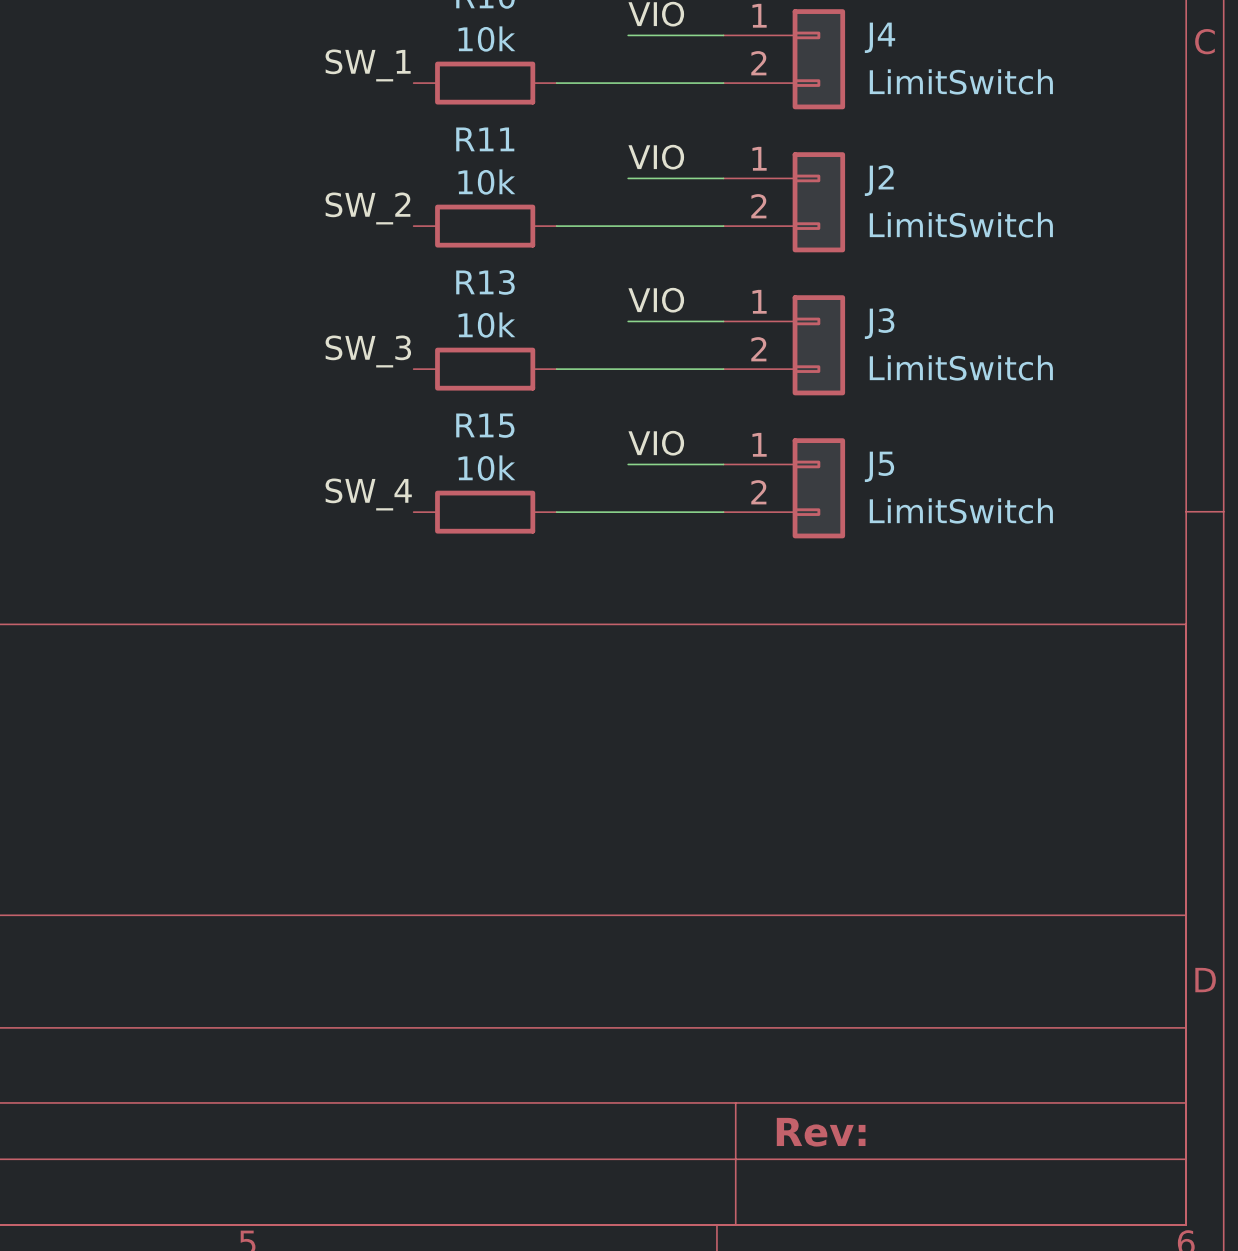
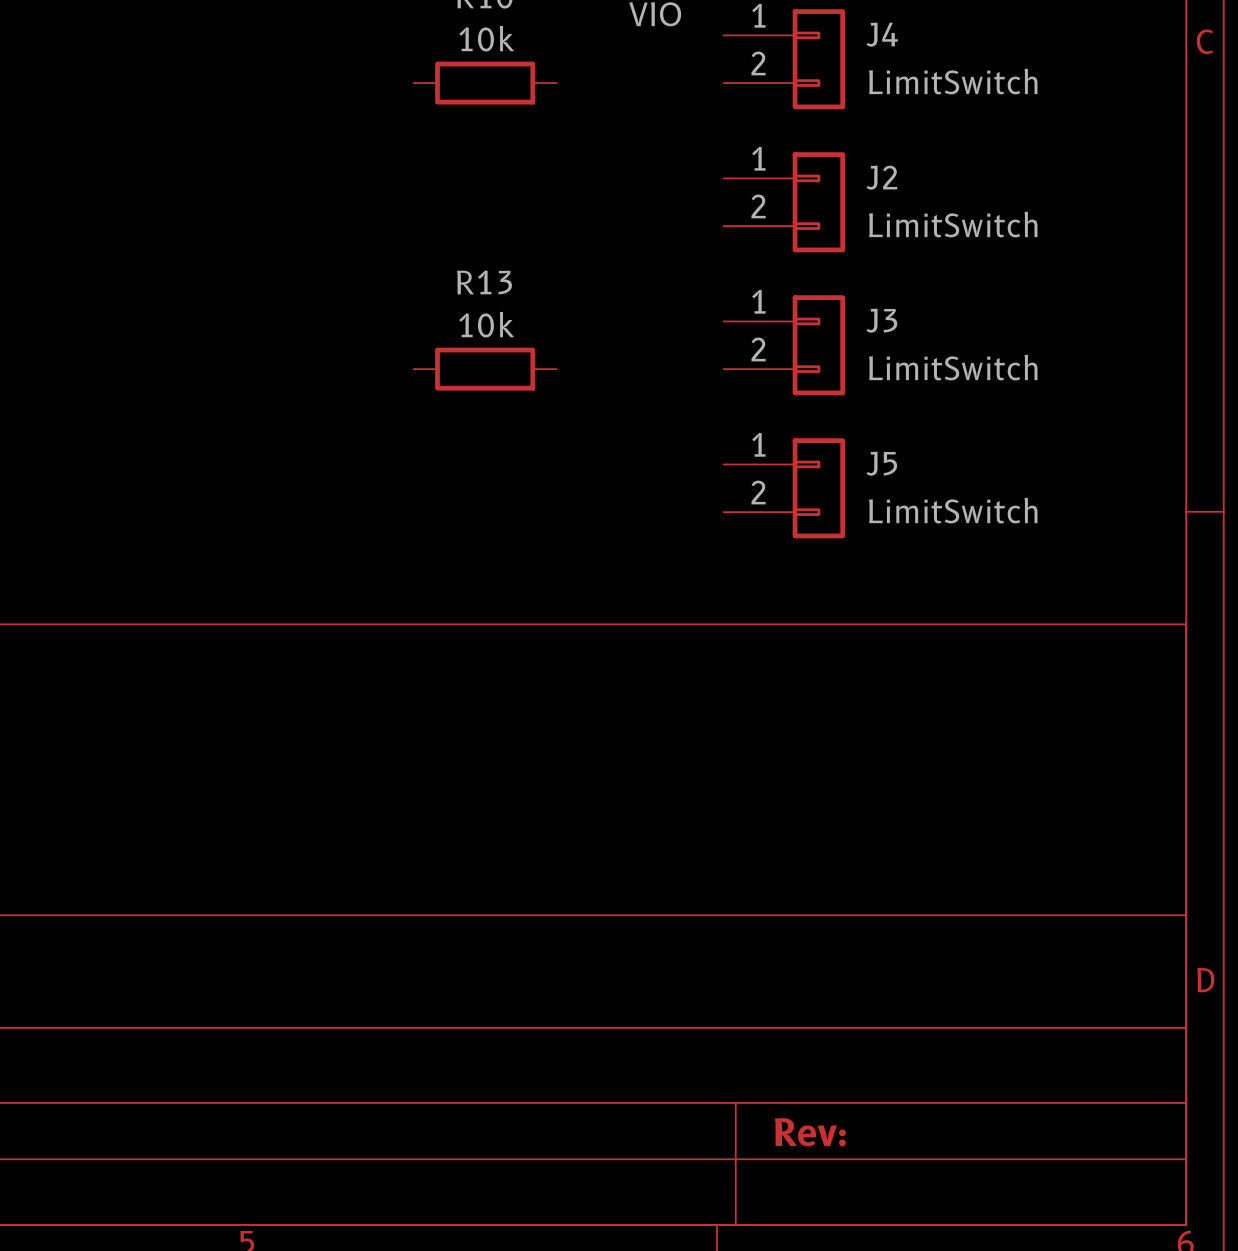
wire: (628, 35) (723, 35) -> none
label: SW_1 (368, 65) -> none
wire: (556, 83) (723, 83) -> none
label: VIO (656, 157) -> none
wire: (628, 178) (723, 178) -> none
label: SW_2 (367, 208) -> none
R11: 10k (485, 226) -> none
wire: (556, 226) (723, 226) -> none
label: VIO (656, 300) -> none
wire: (628, 321) (723, 321) -> none
label: SW_3 (368, 351) -> none
wire: (556, 369) (723, 369) -> none
label: VIO (656, 443) -> none
wire: (628, 464) (723, 464) -> none
label: SW_4 (368, 494) -> none
R15: 10k (485, 512) -> none
wire: (556, 512) (723, 512) -> none

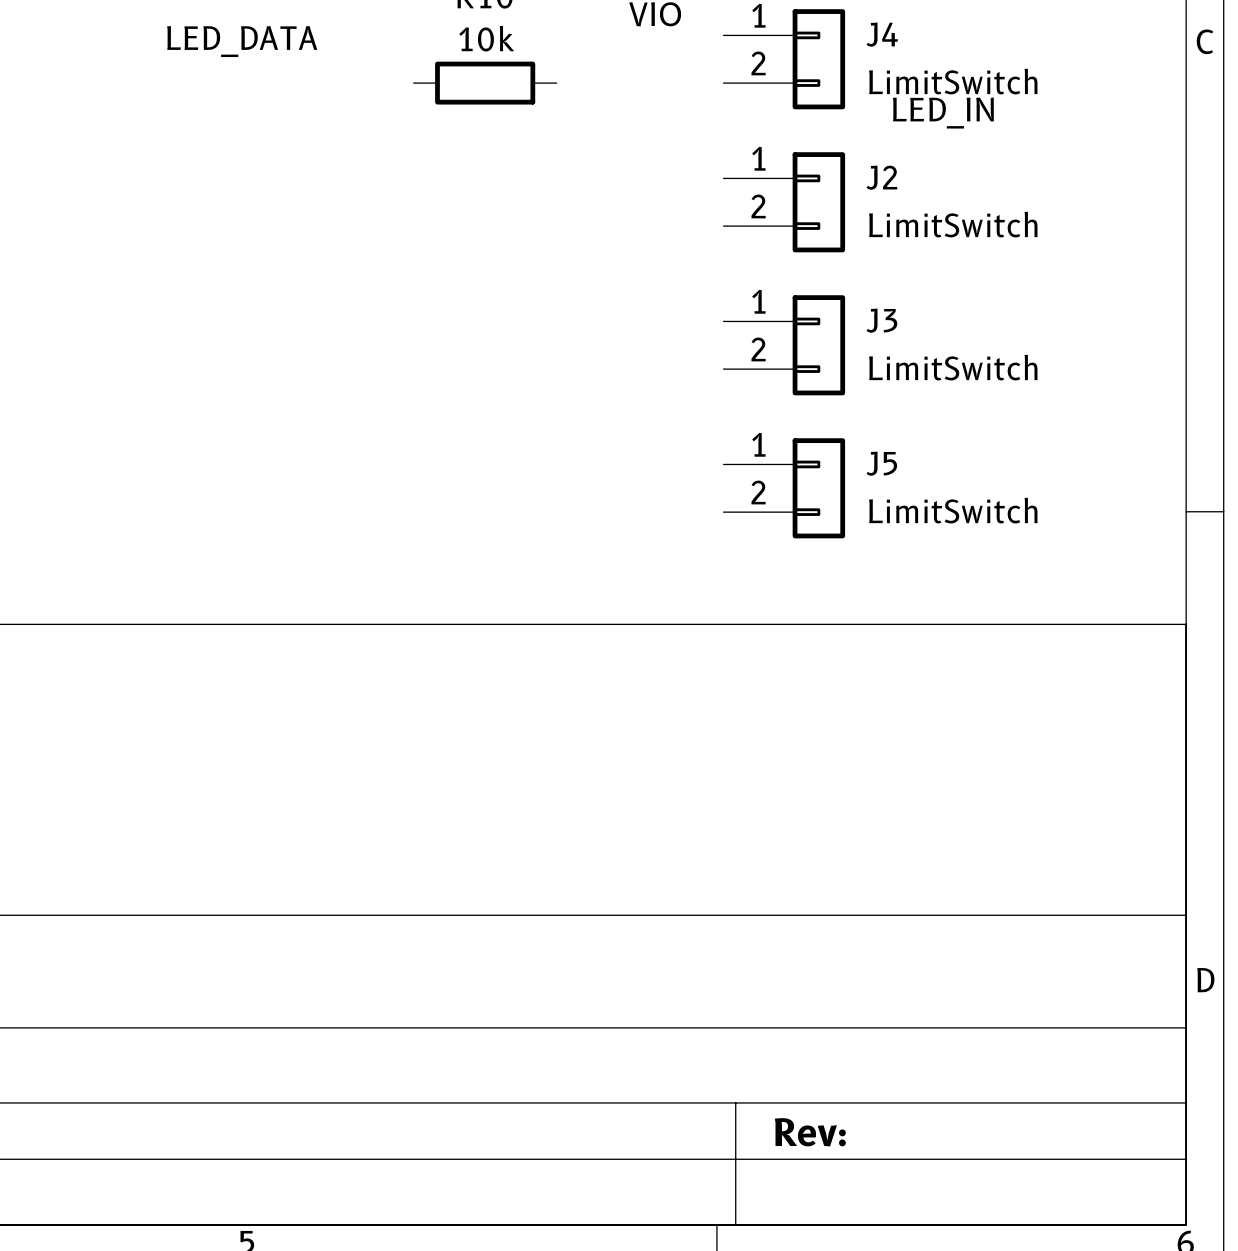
label: none -> LED_DATA (242, 41)
label: none -> LED_IN (943, 113)
R13: 10k (485, 369) -> none

